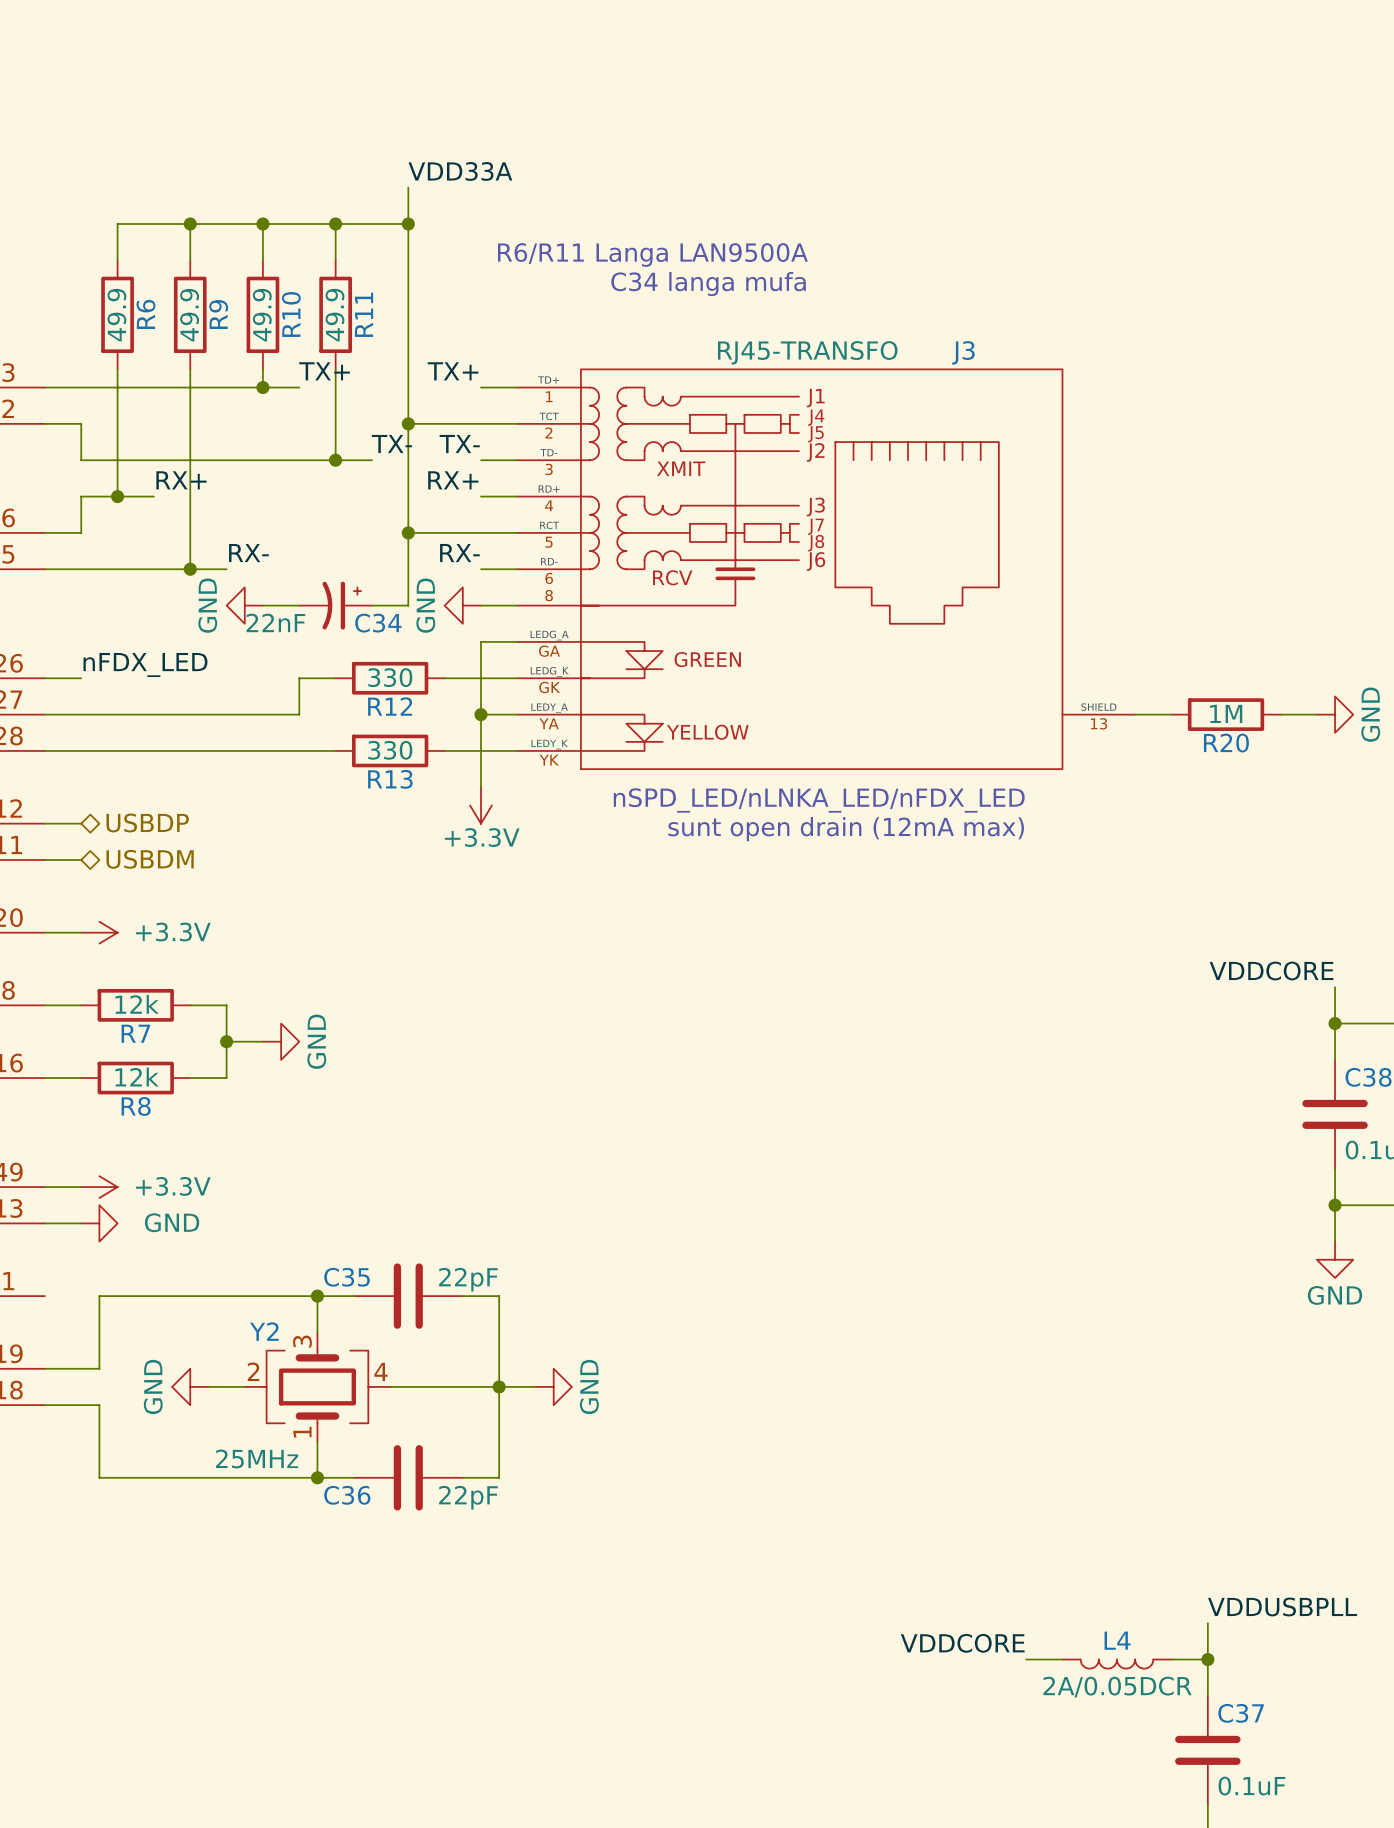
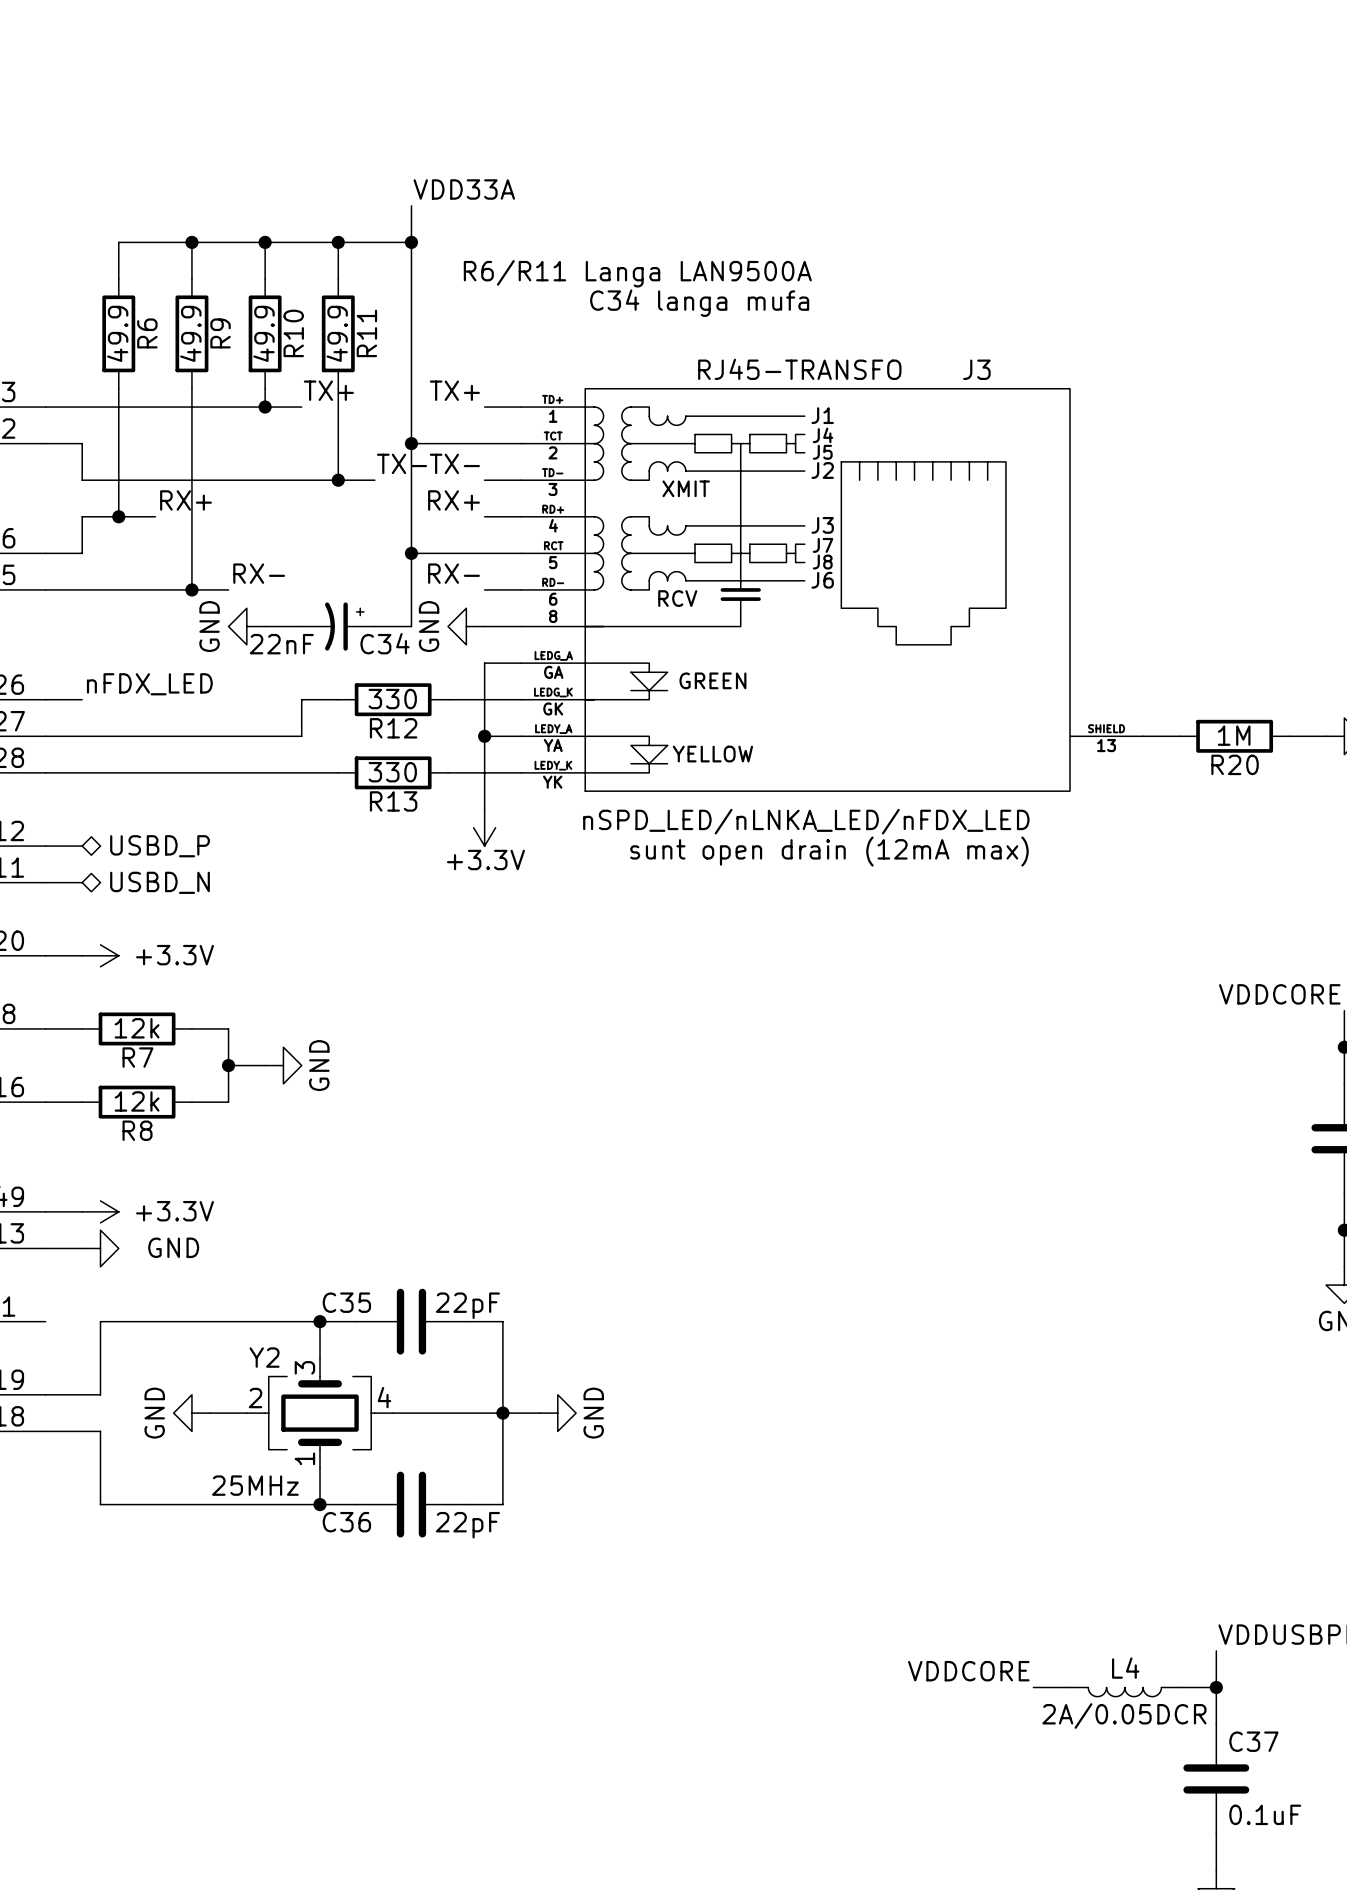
hierarchical label: USBDP (147, 822) -> USBD_P (160, 846)
hierarchical label: USBDM (150, 859) -> USBD_N (160, 882)

